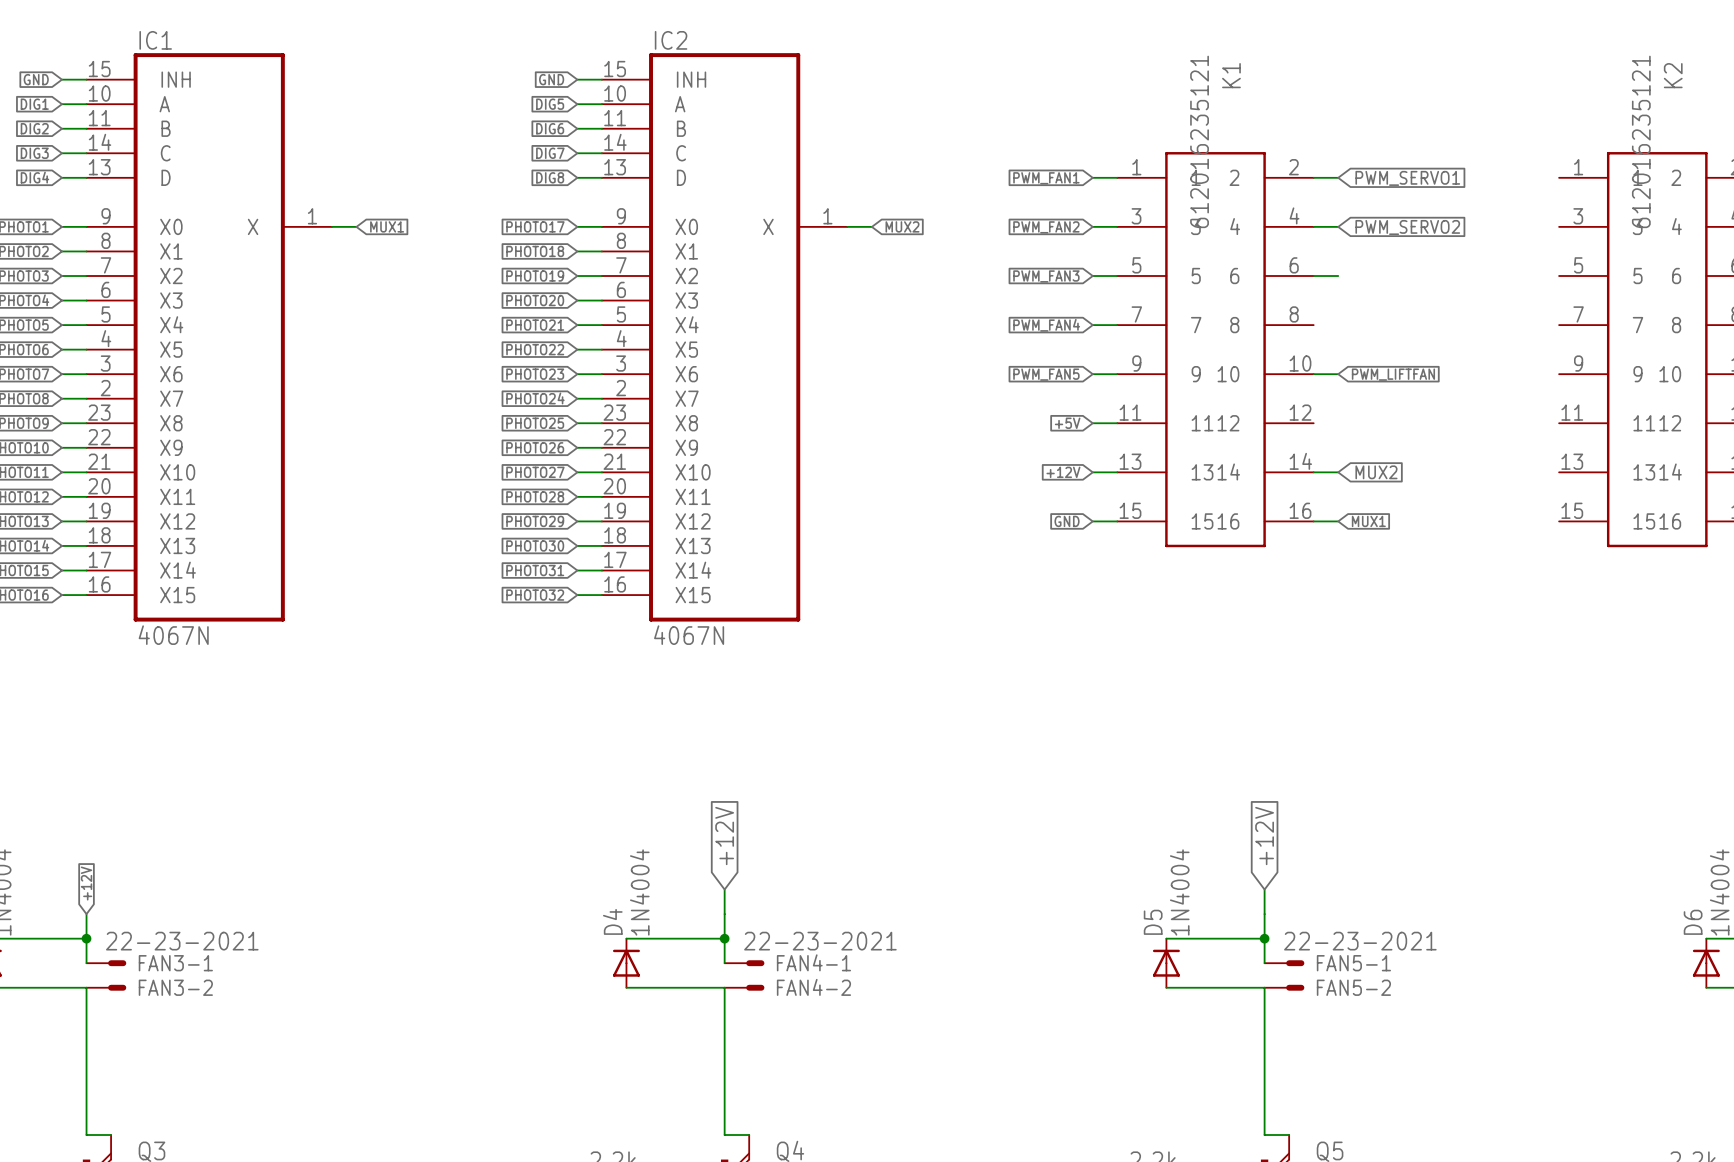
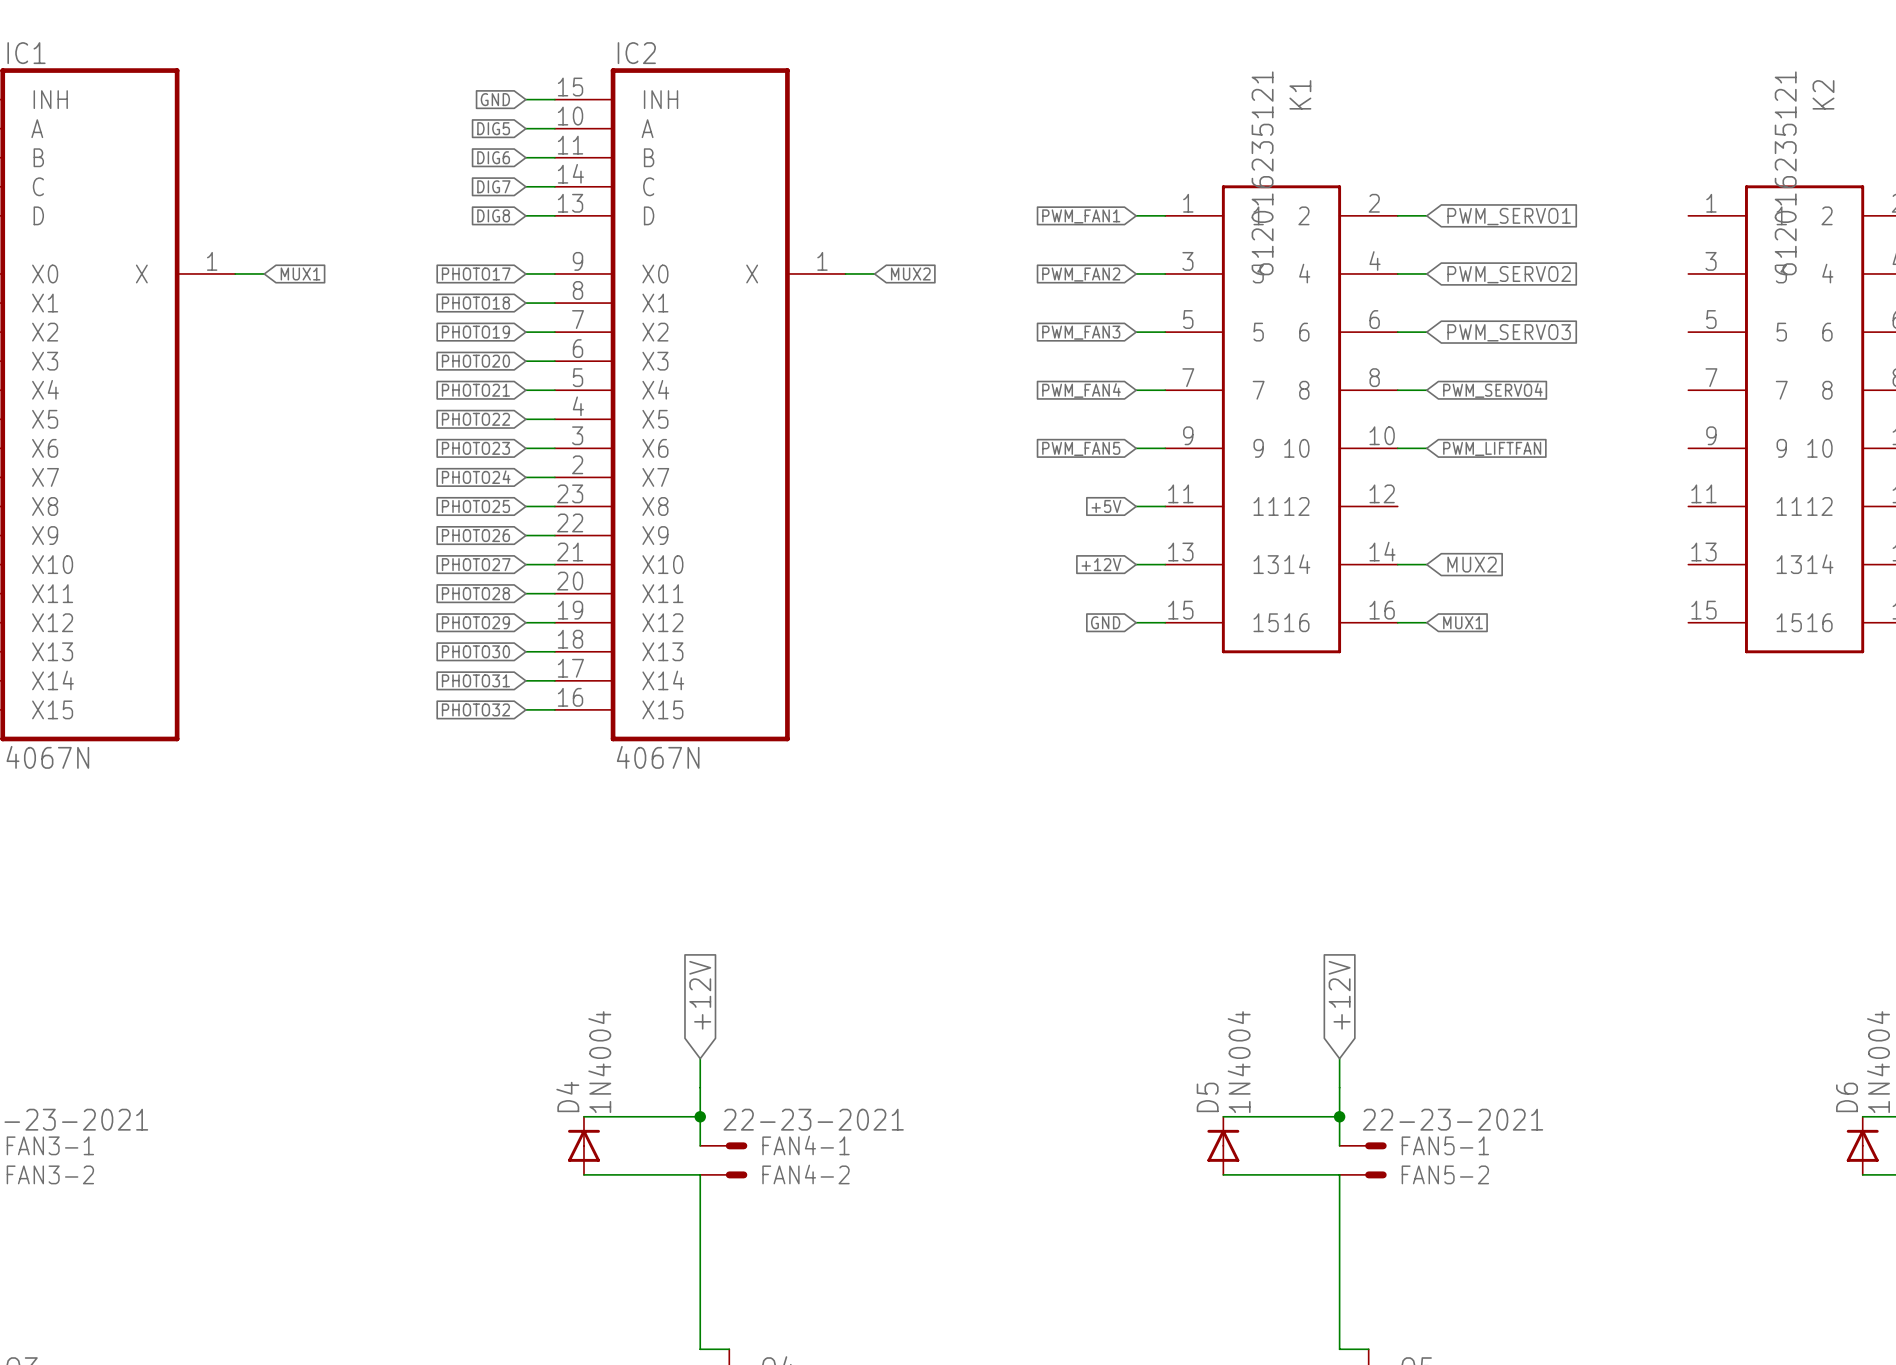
global label: none -> PWM_SERVO3 (1509, 332)
wire: none -> (1397, 390) (1426, 390)
global label: none -> PWM_SERVO4 (1492, 390)

